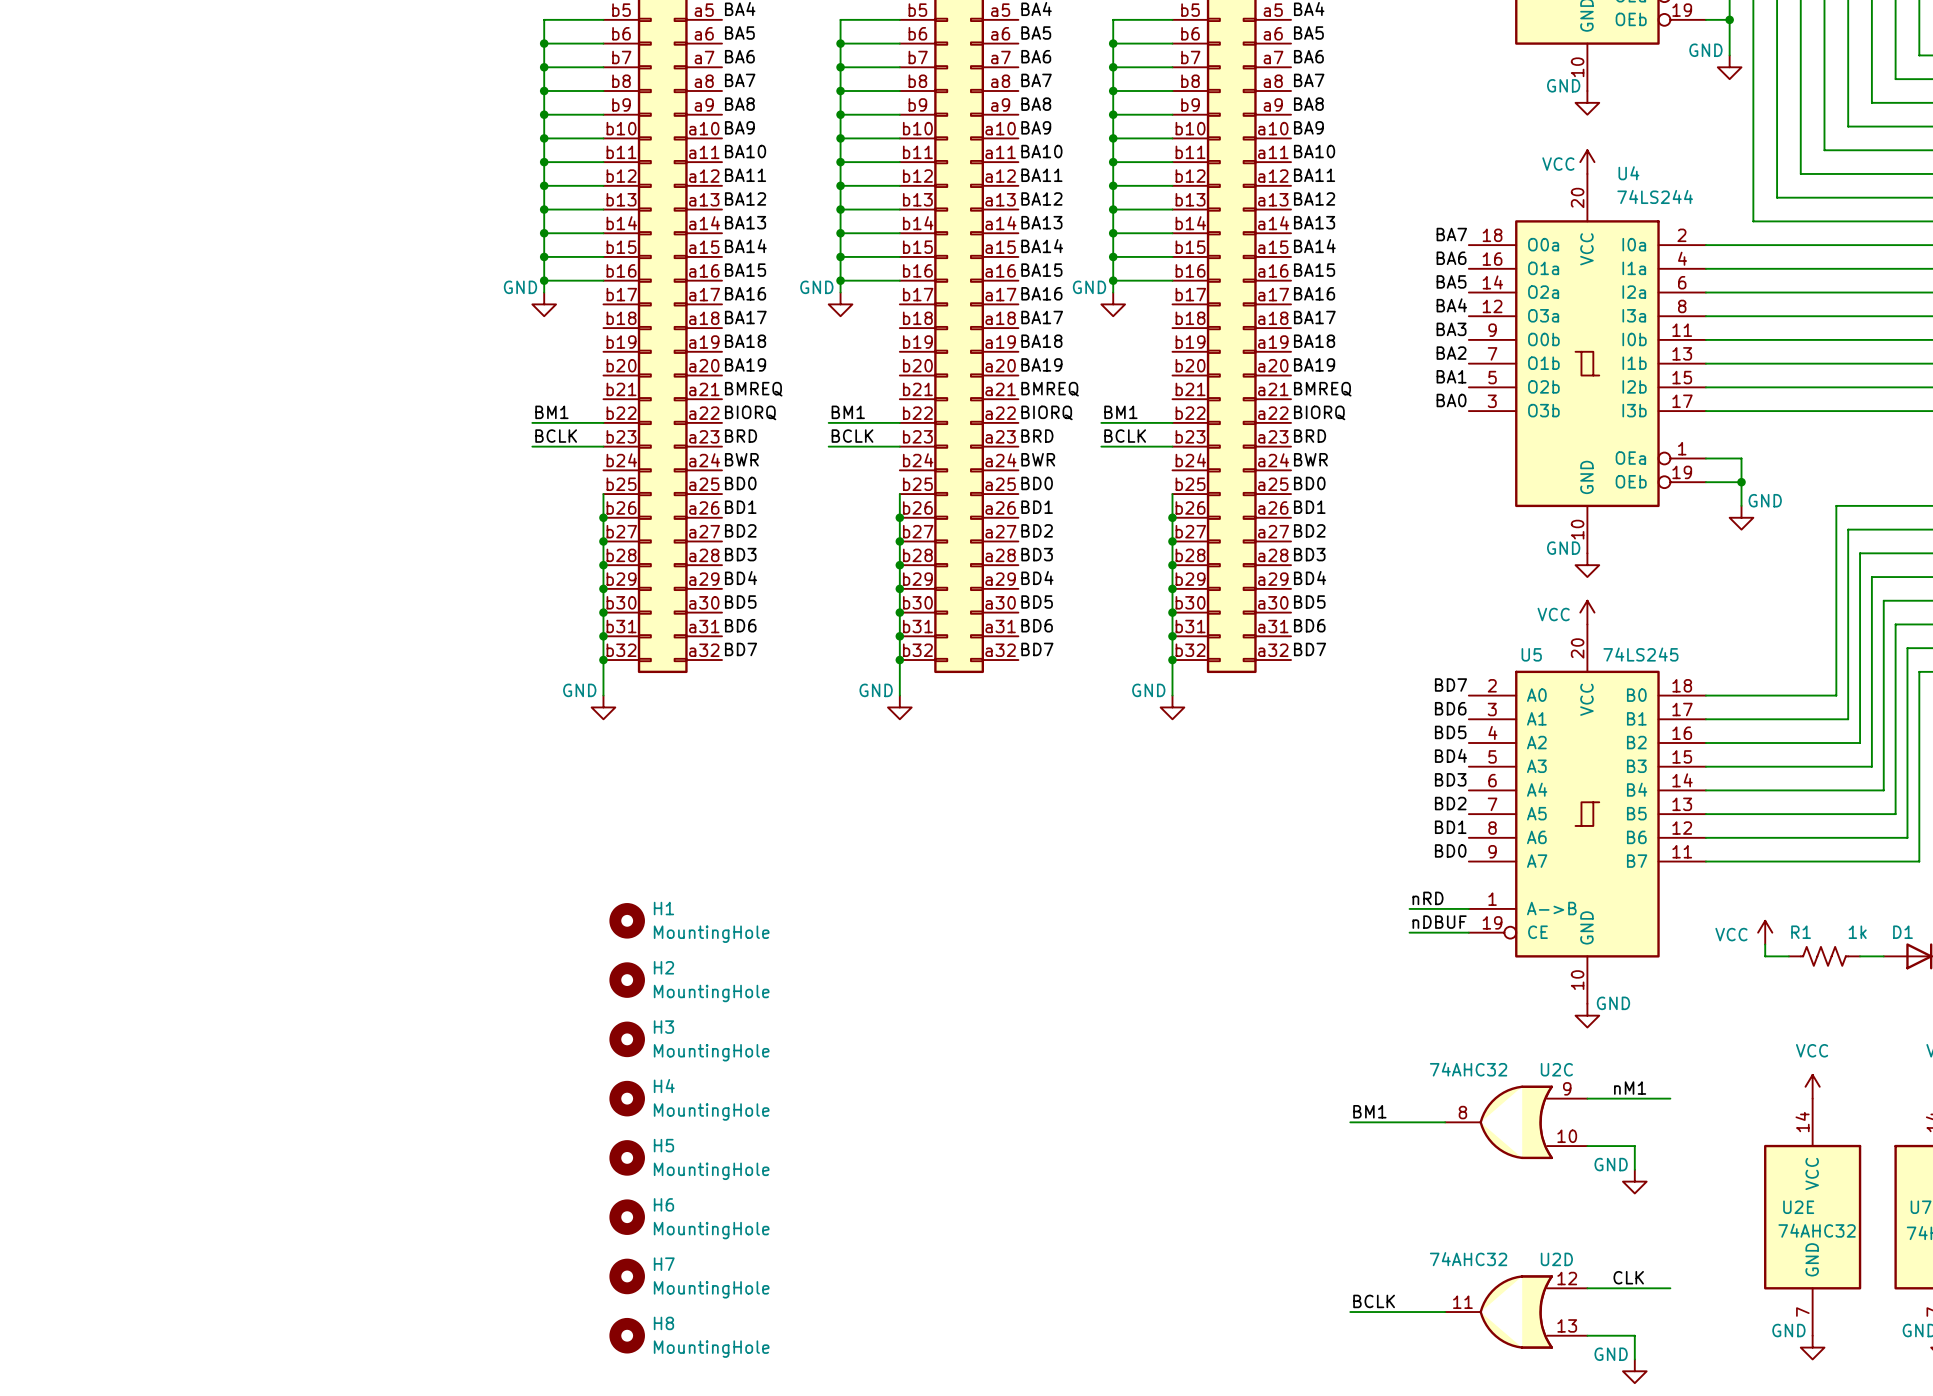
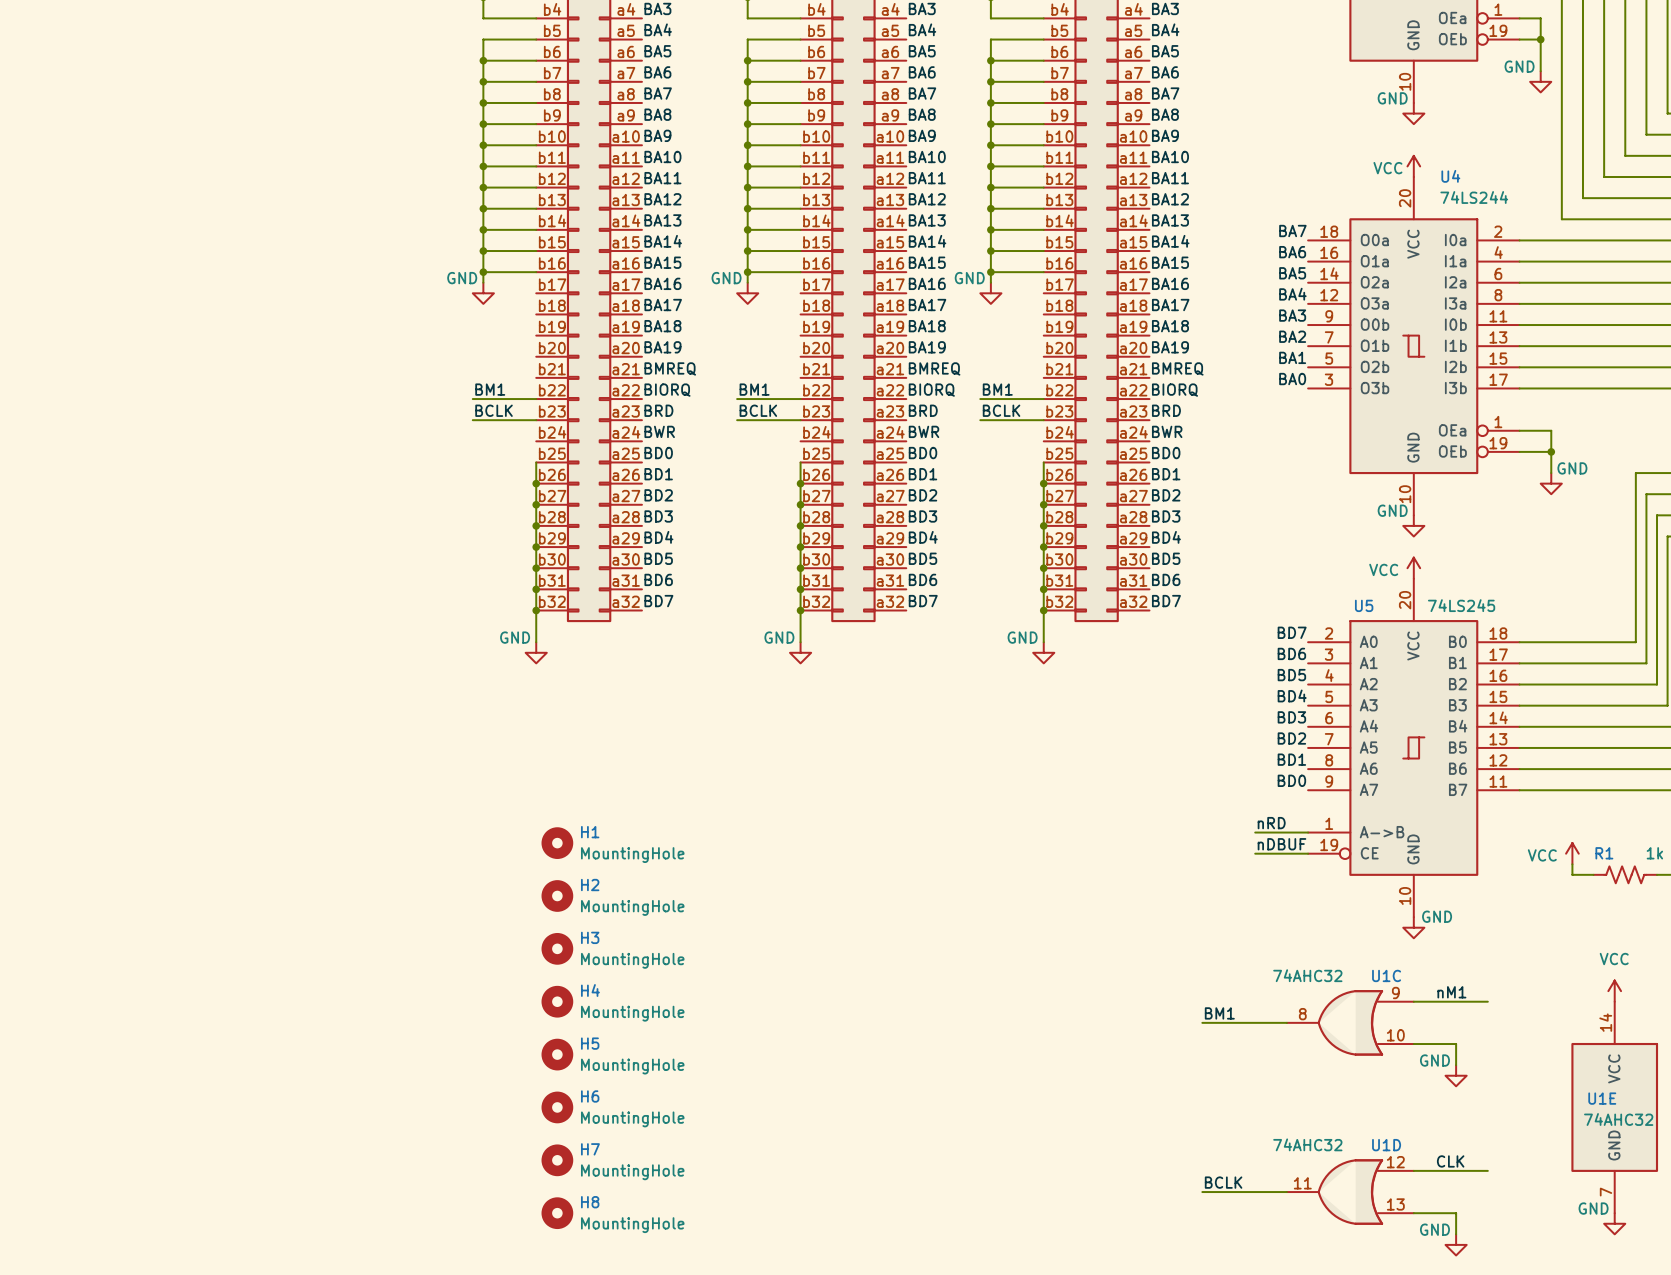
U2C name: U2C (1556, 1069) -> U1C (1386, 975)
U2E name: U2E (1798, 1207) -> U1E (1602, 1098)
U2D name: U2D (1556, 1259) -> U1D (1386, 1145)

